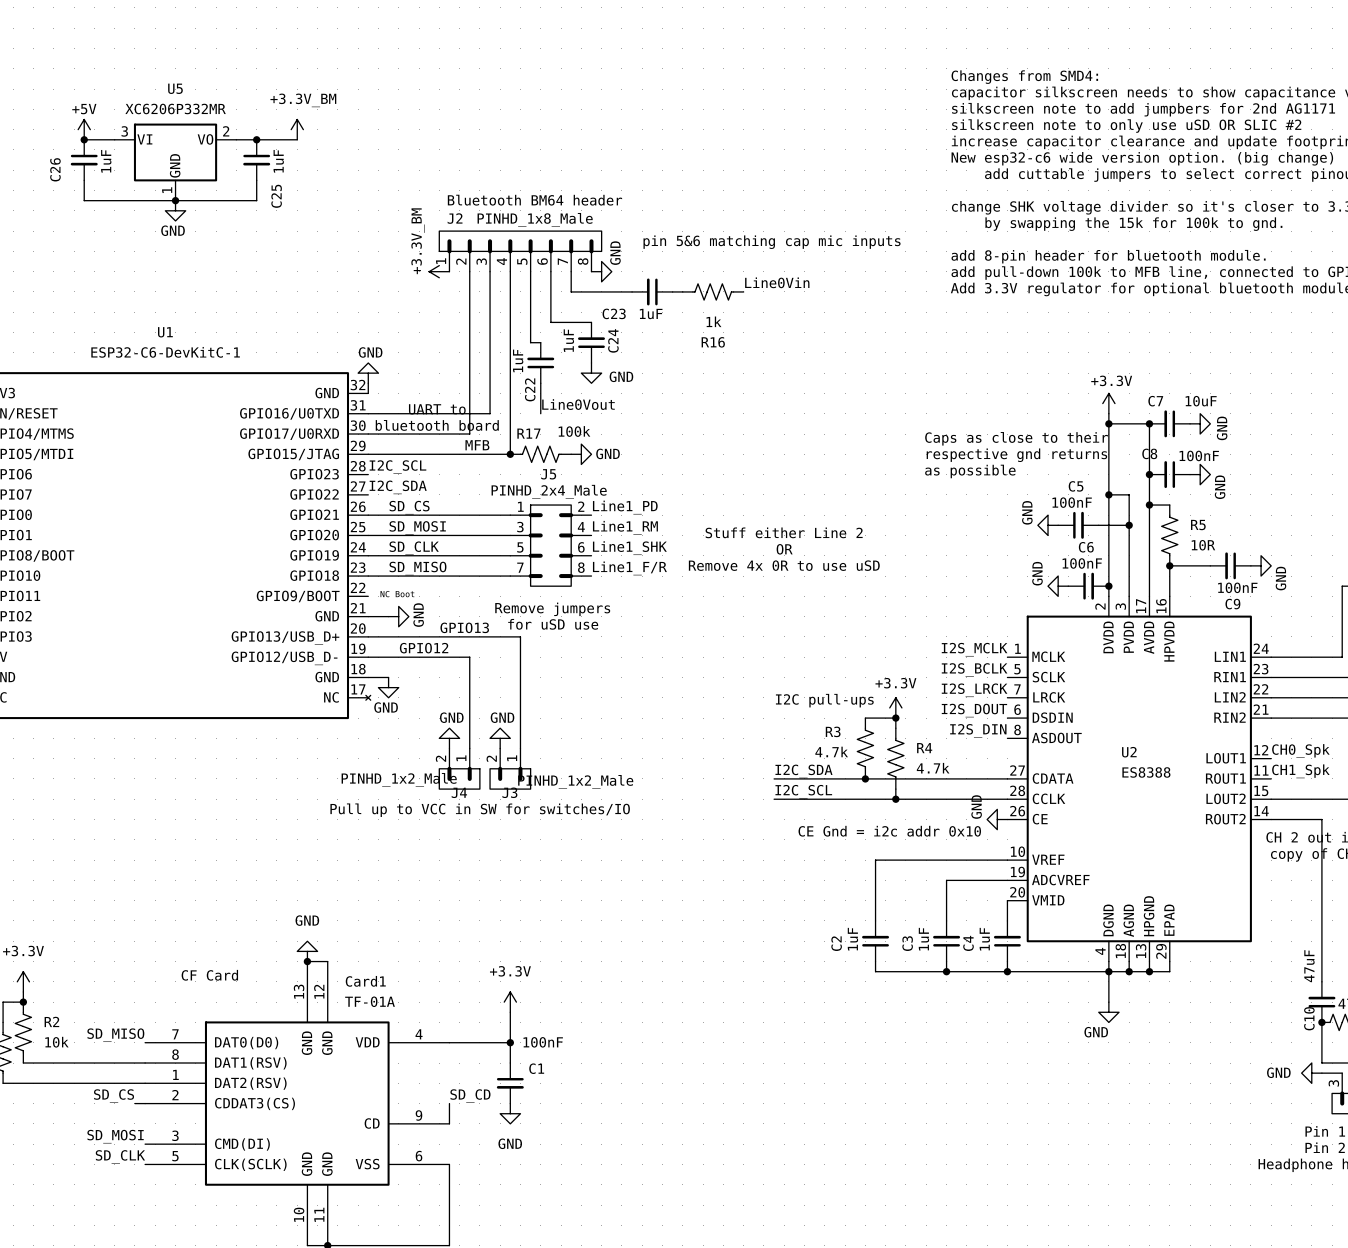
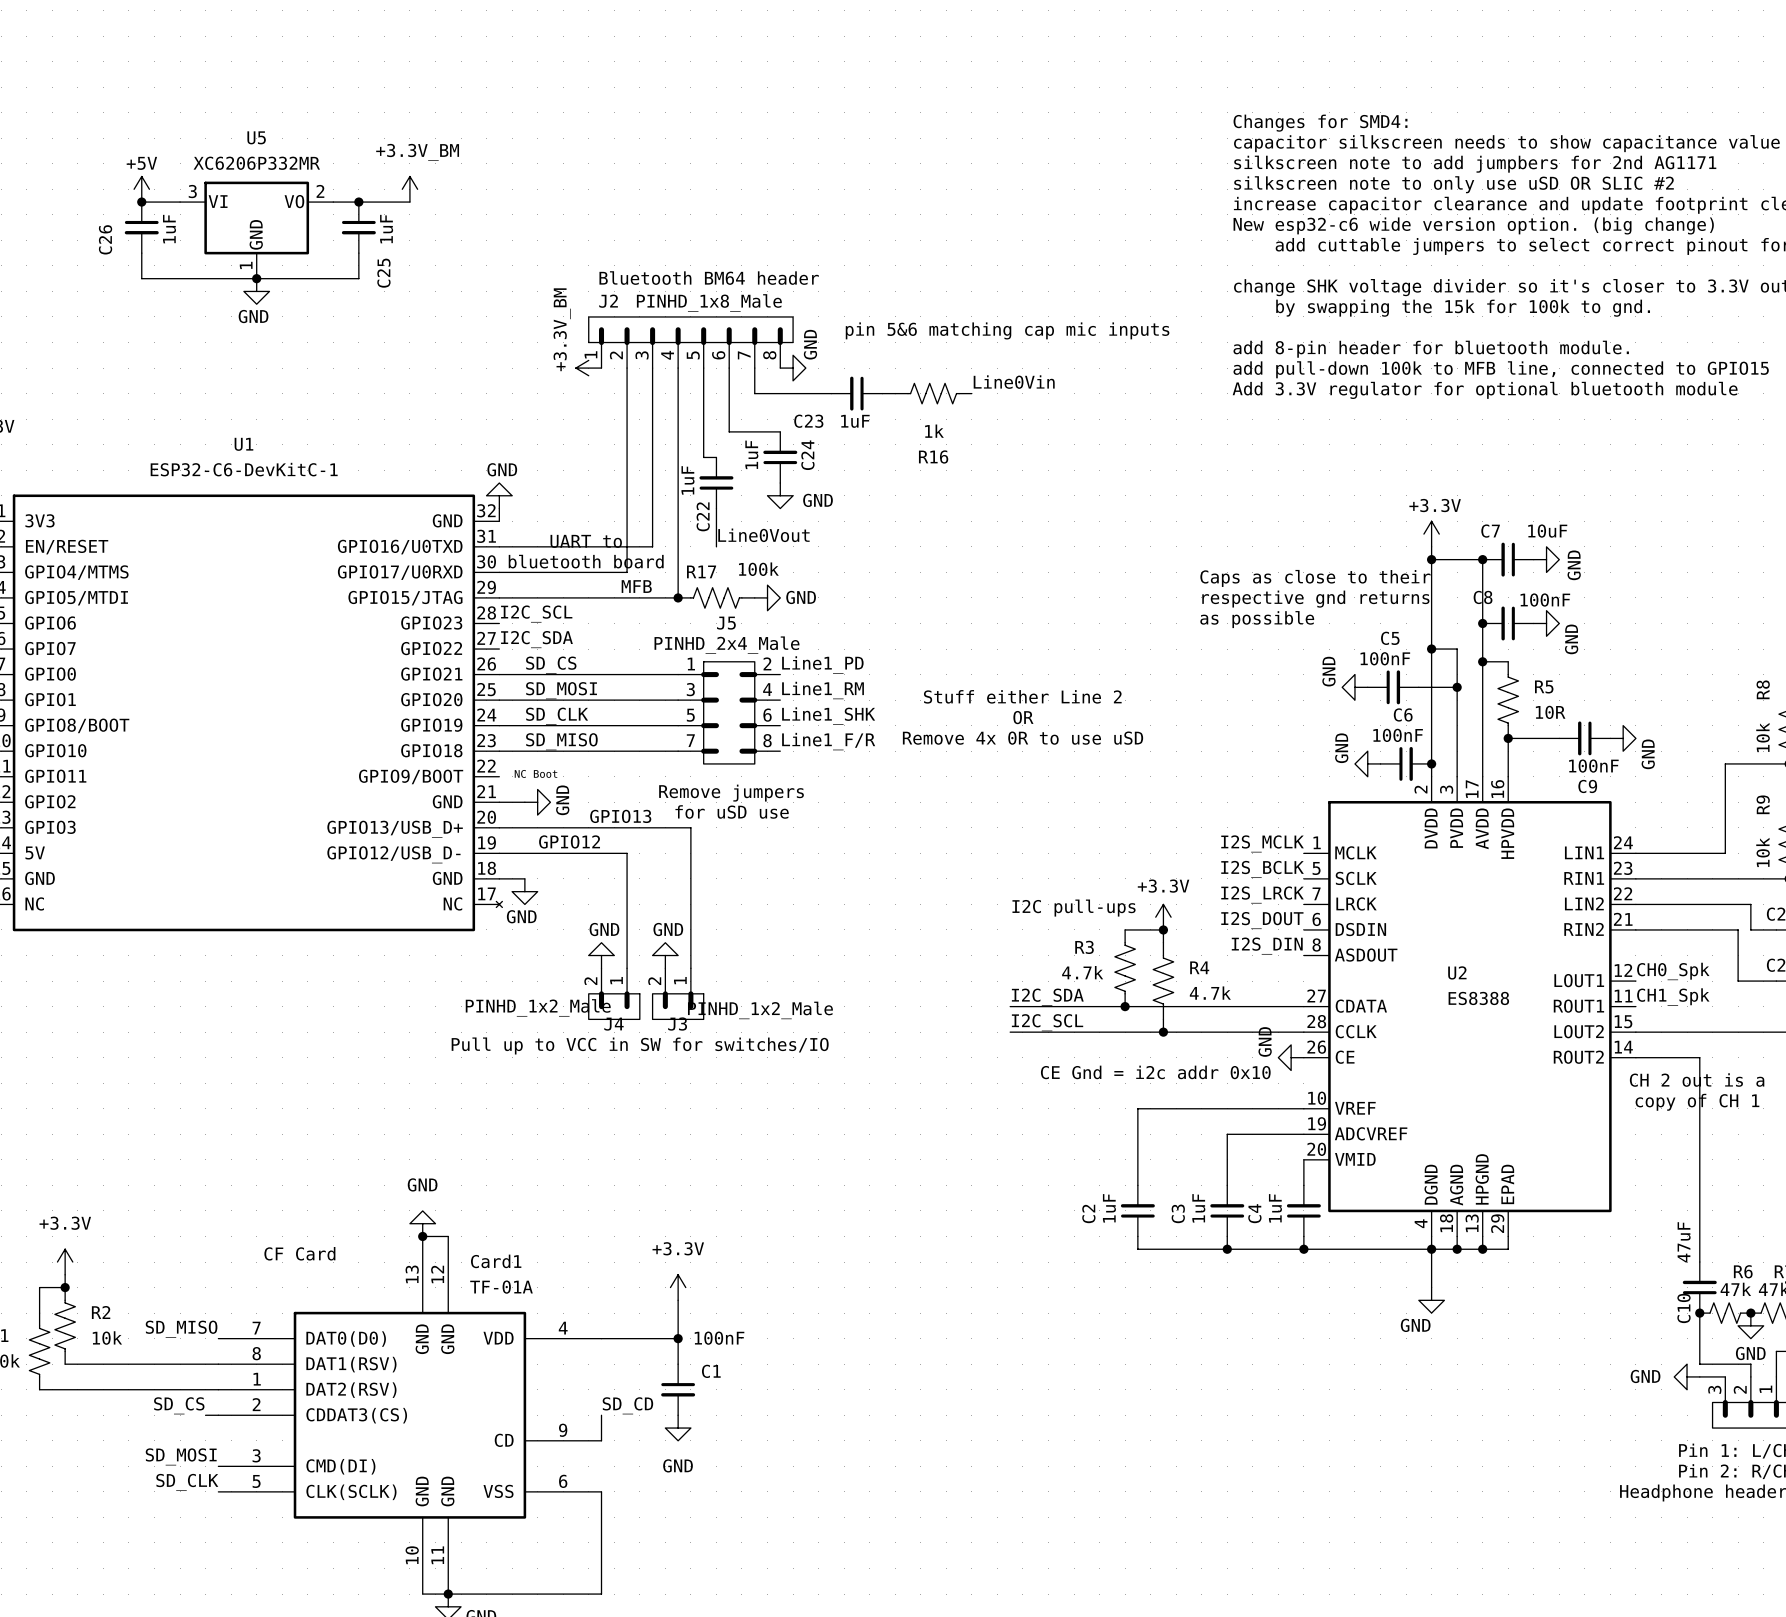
text: Changes from SMD4: (1024, 77) -> Changes for SMD4: (1320, 123)

